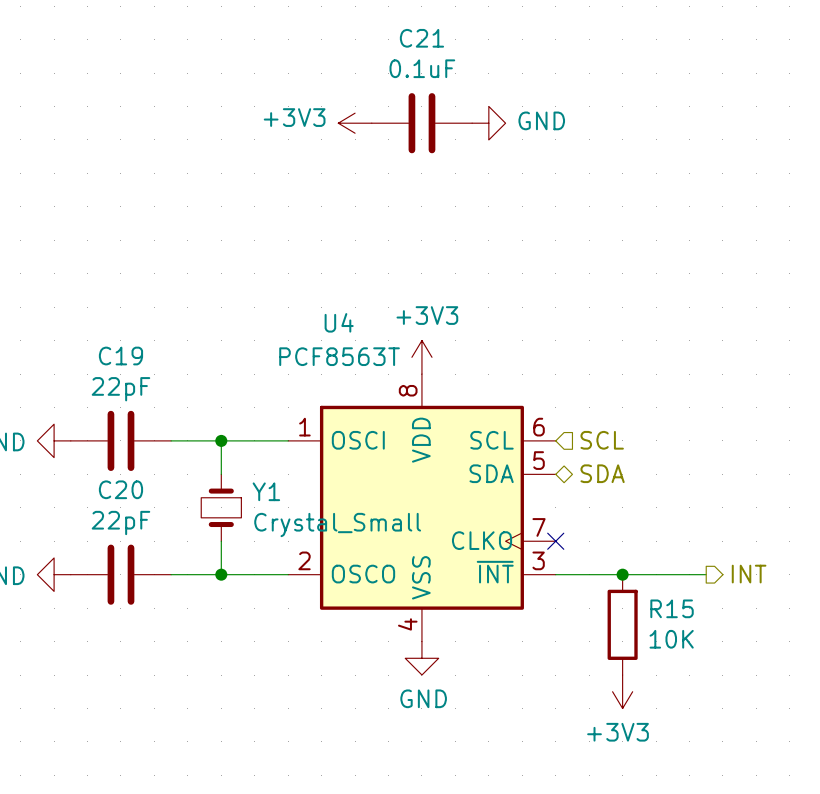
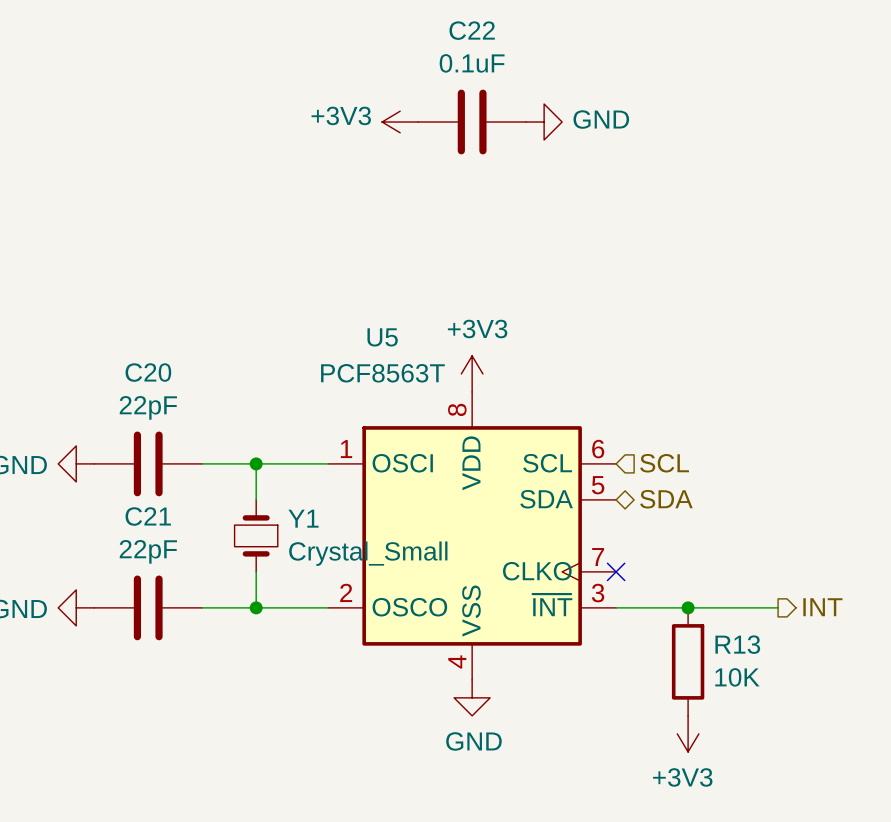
C21 name: C21 (421, 38) -> C22 (472, 30)
U4 name: U4 (339, 322) -> U5 (382, 337)
C19 name: C19 (120, 356) -> C20 (148, 372)
C20 name: C20 (120, 489) -> C21 (148, 516)
R15 name: R15 (672, 608) -> R13 (737, 644)

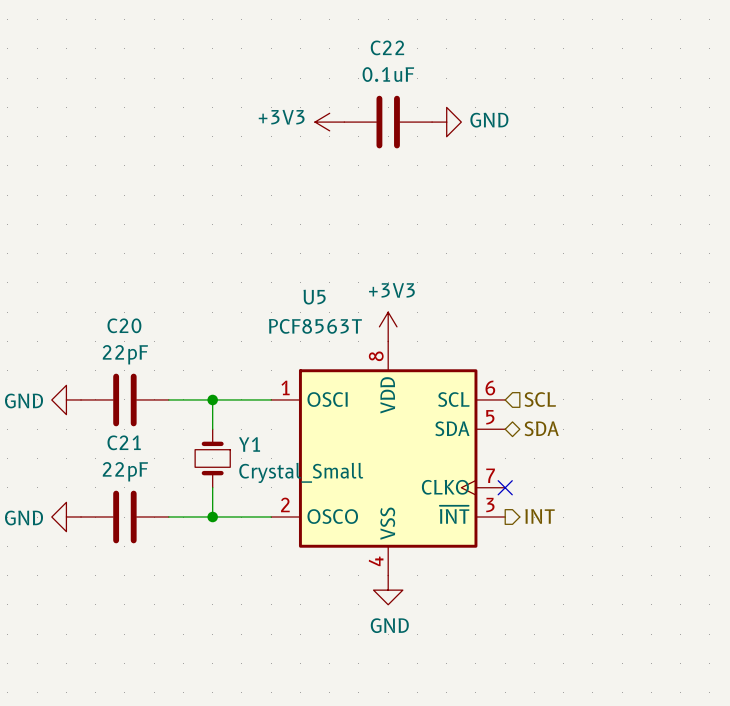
wire: (616, 607) (778, 607) -> none
junction: (688, 607) -> none
hierarchical label position: INT (822, 607) -> INT (540, 516)
R13: 10K (688, 661) -> none
power symbol: +3V3 (688, 733) -> none

